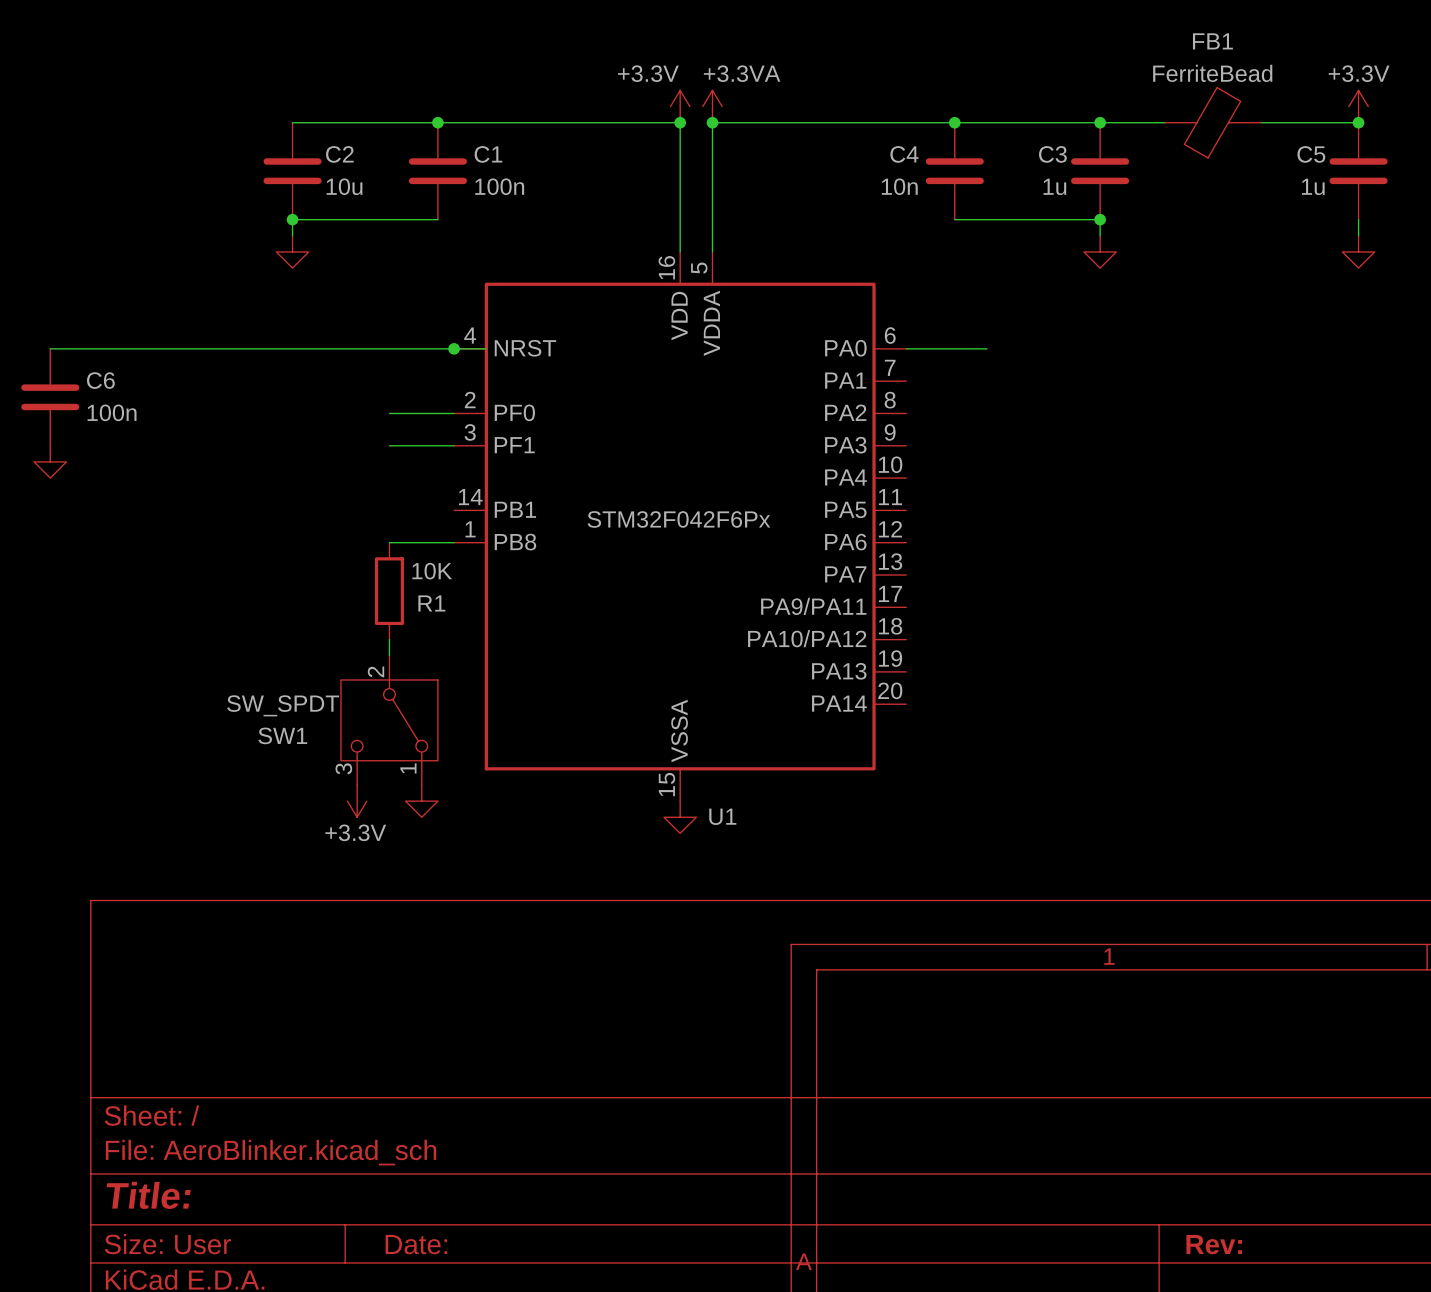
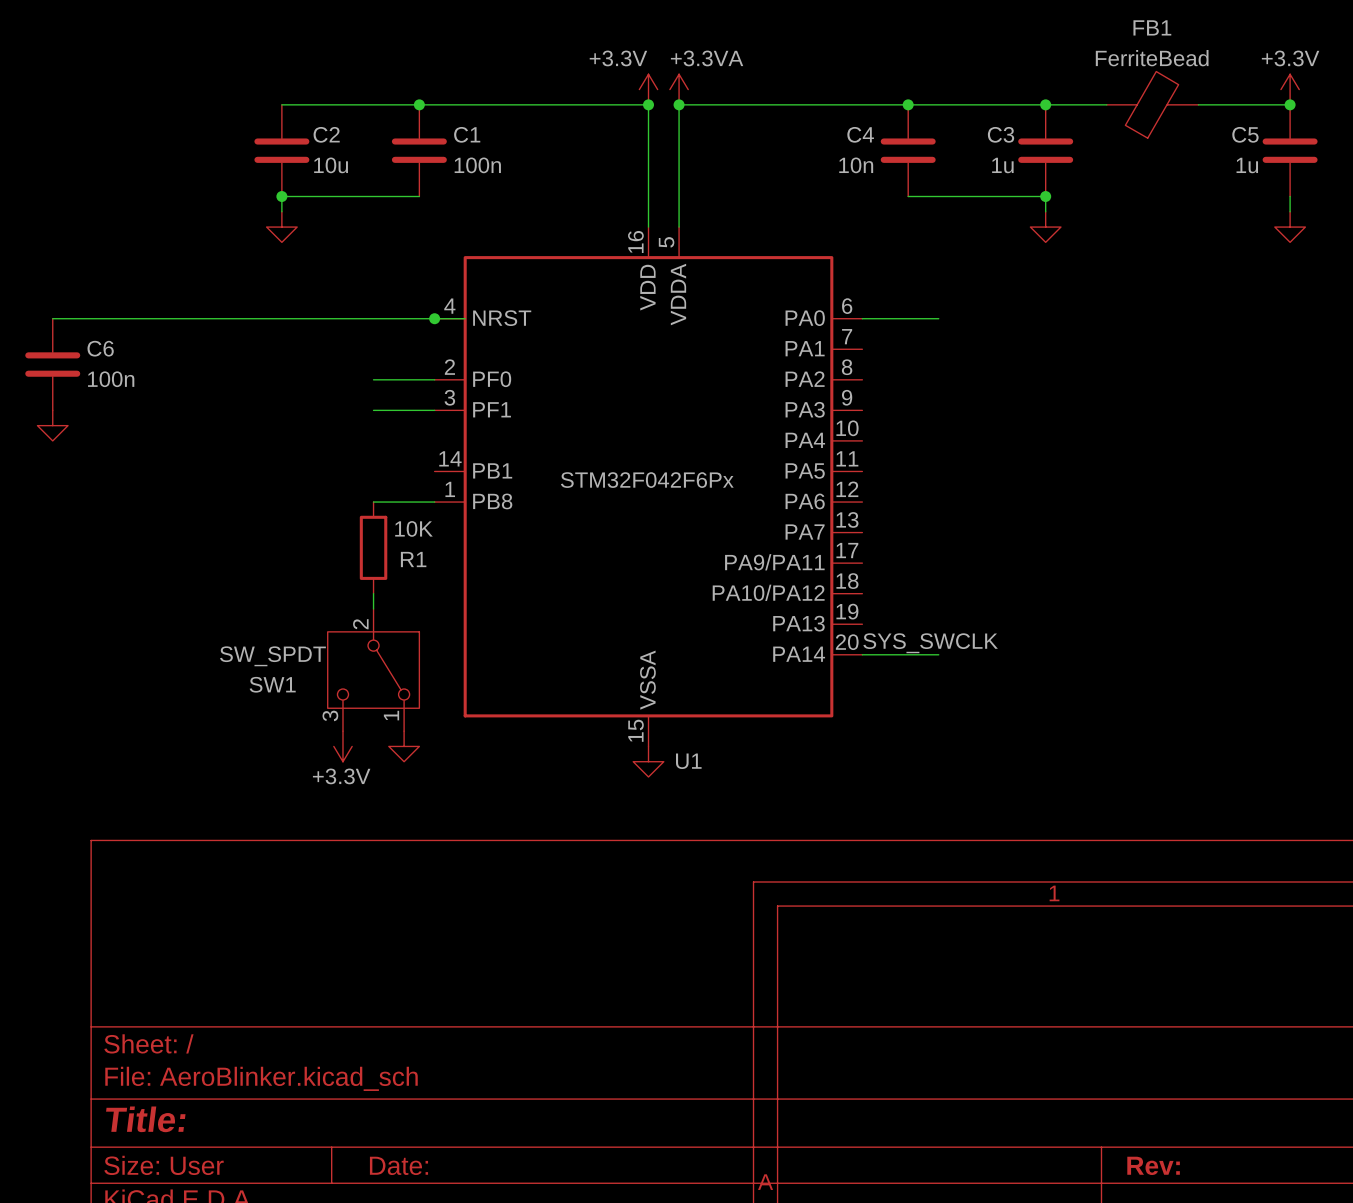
label: none -> SYS_SWCLK (930, 643)
wire: none -> (862, 654) (938, 654)

